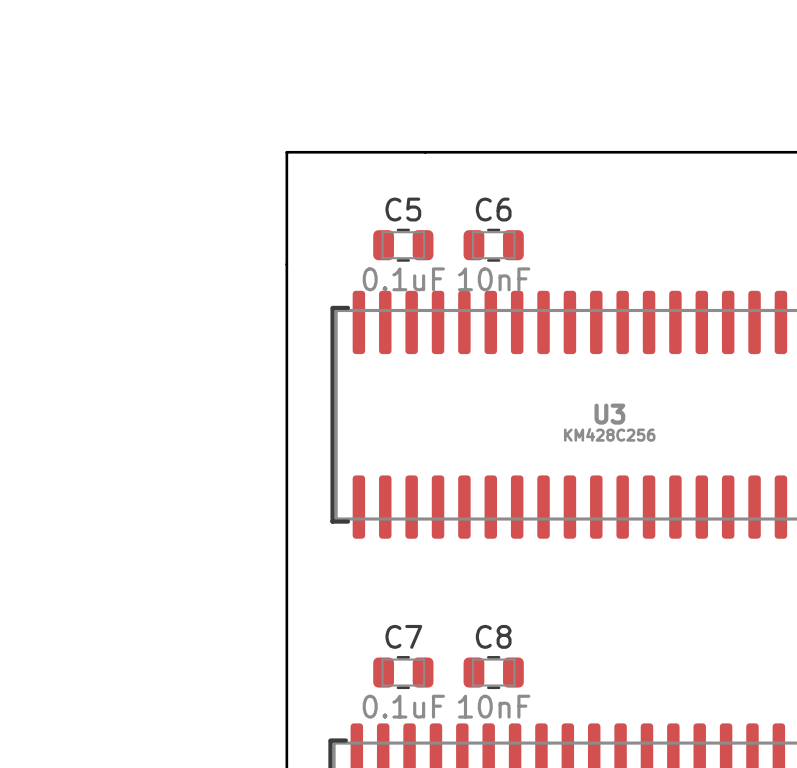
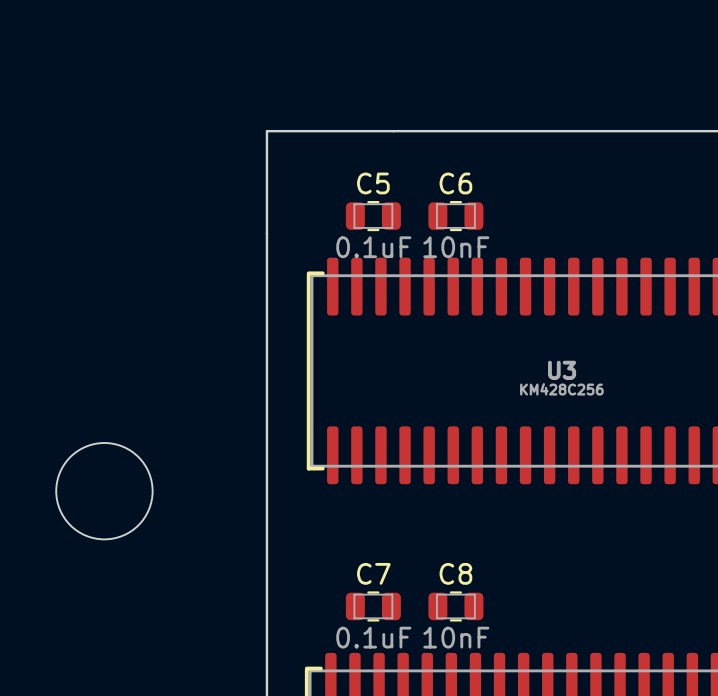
round board edge: none -> [55, 442, 154, 541]

